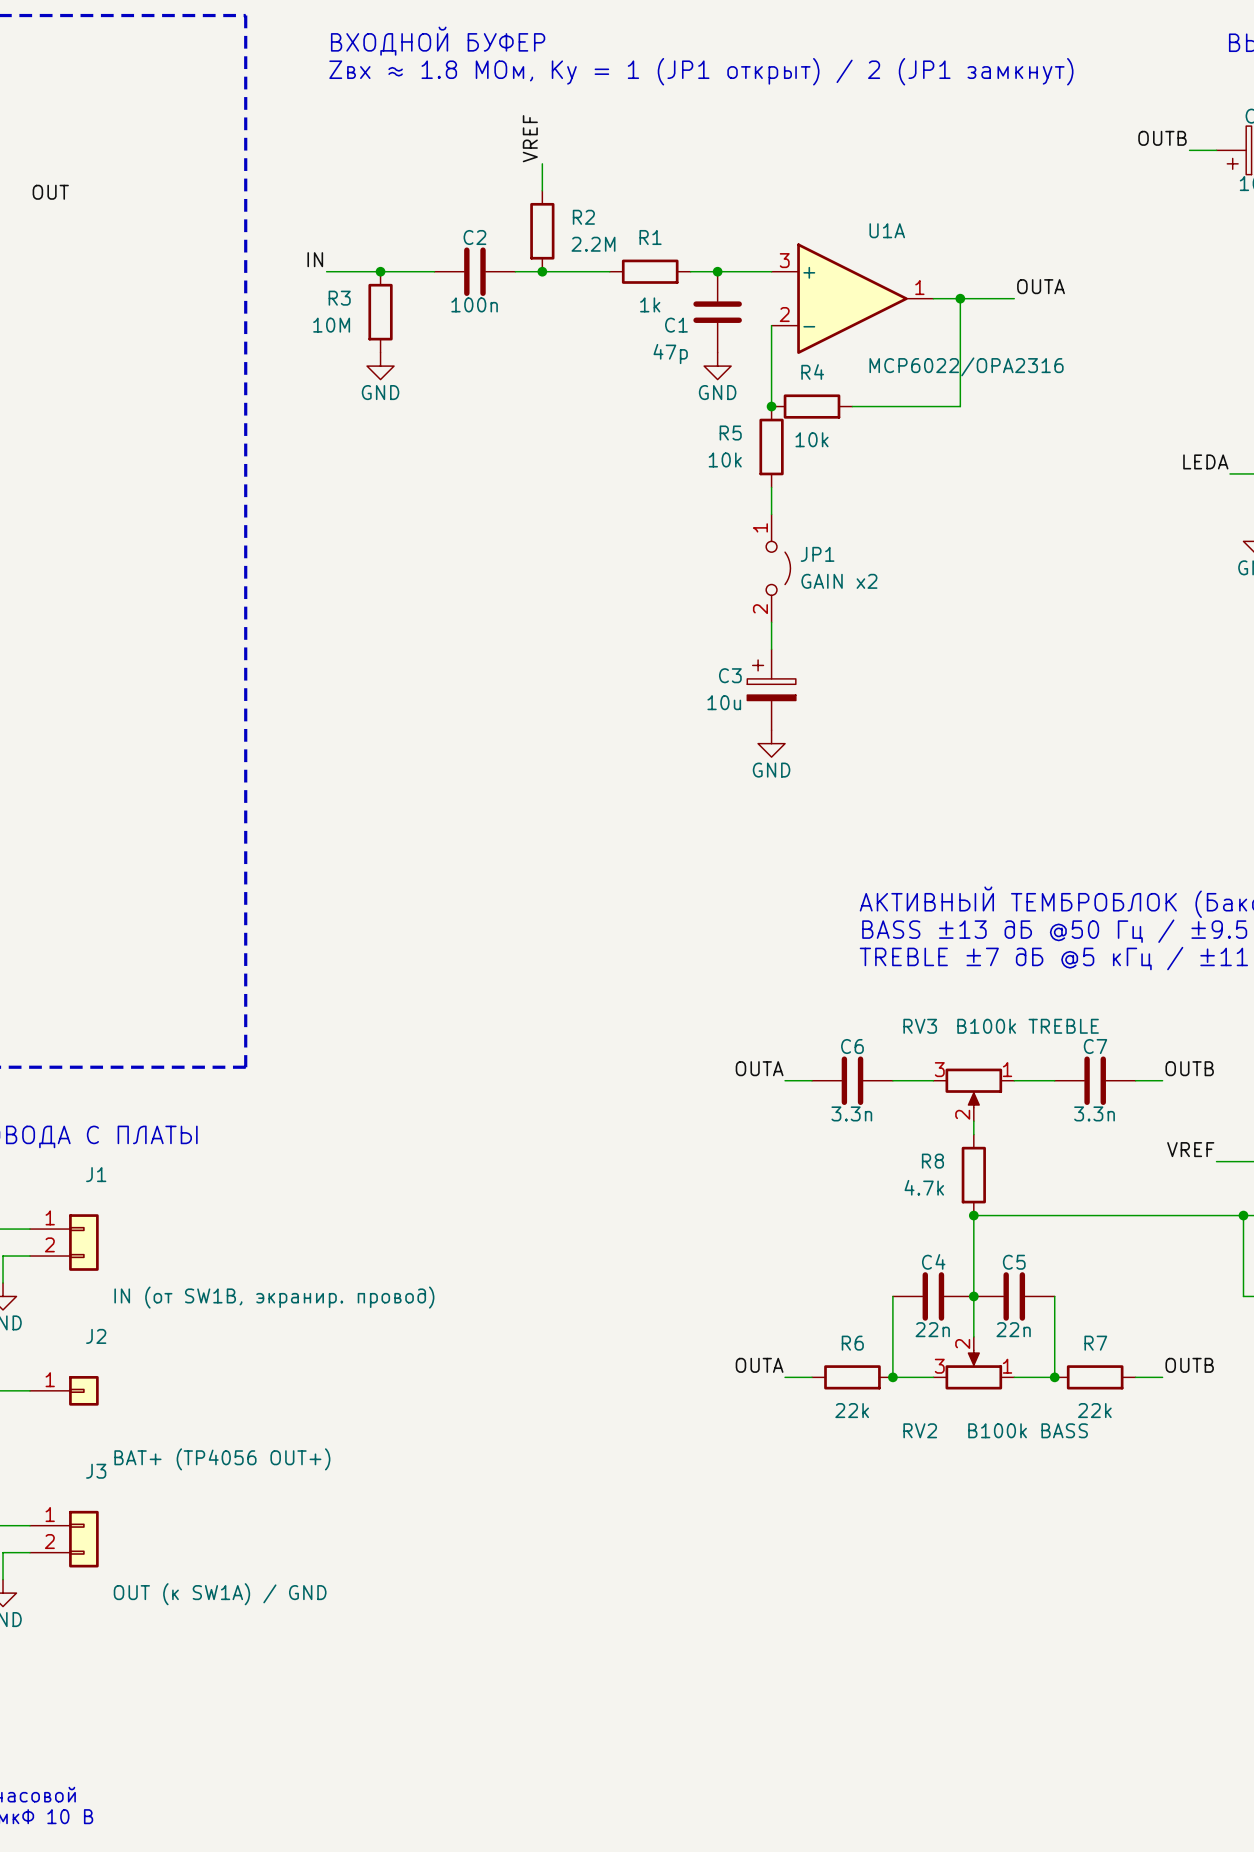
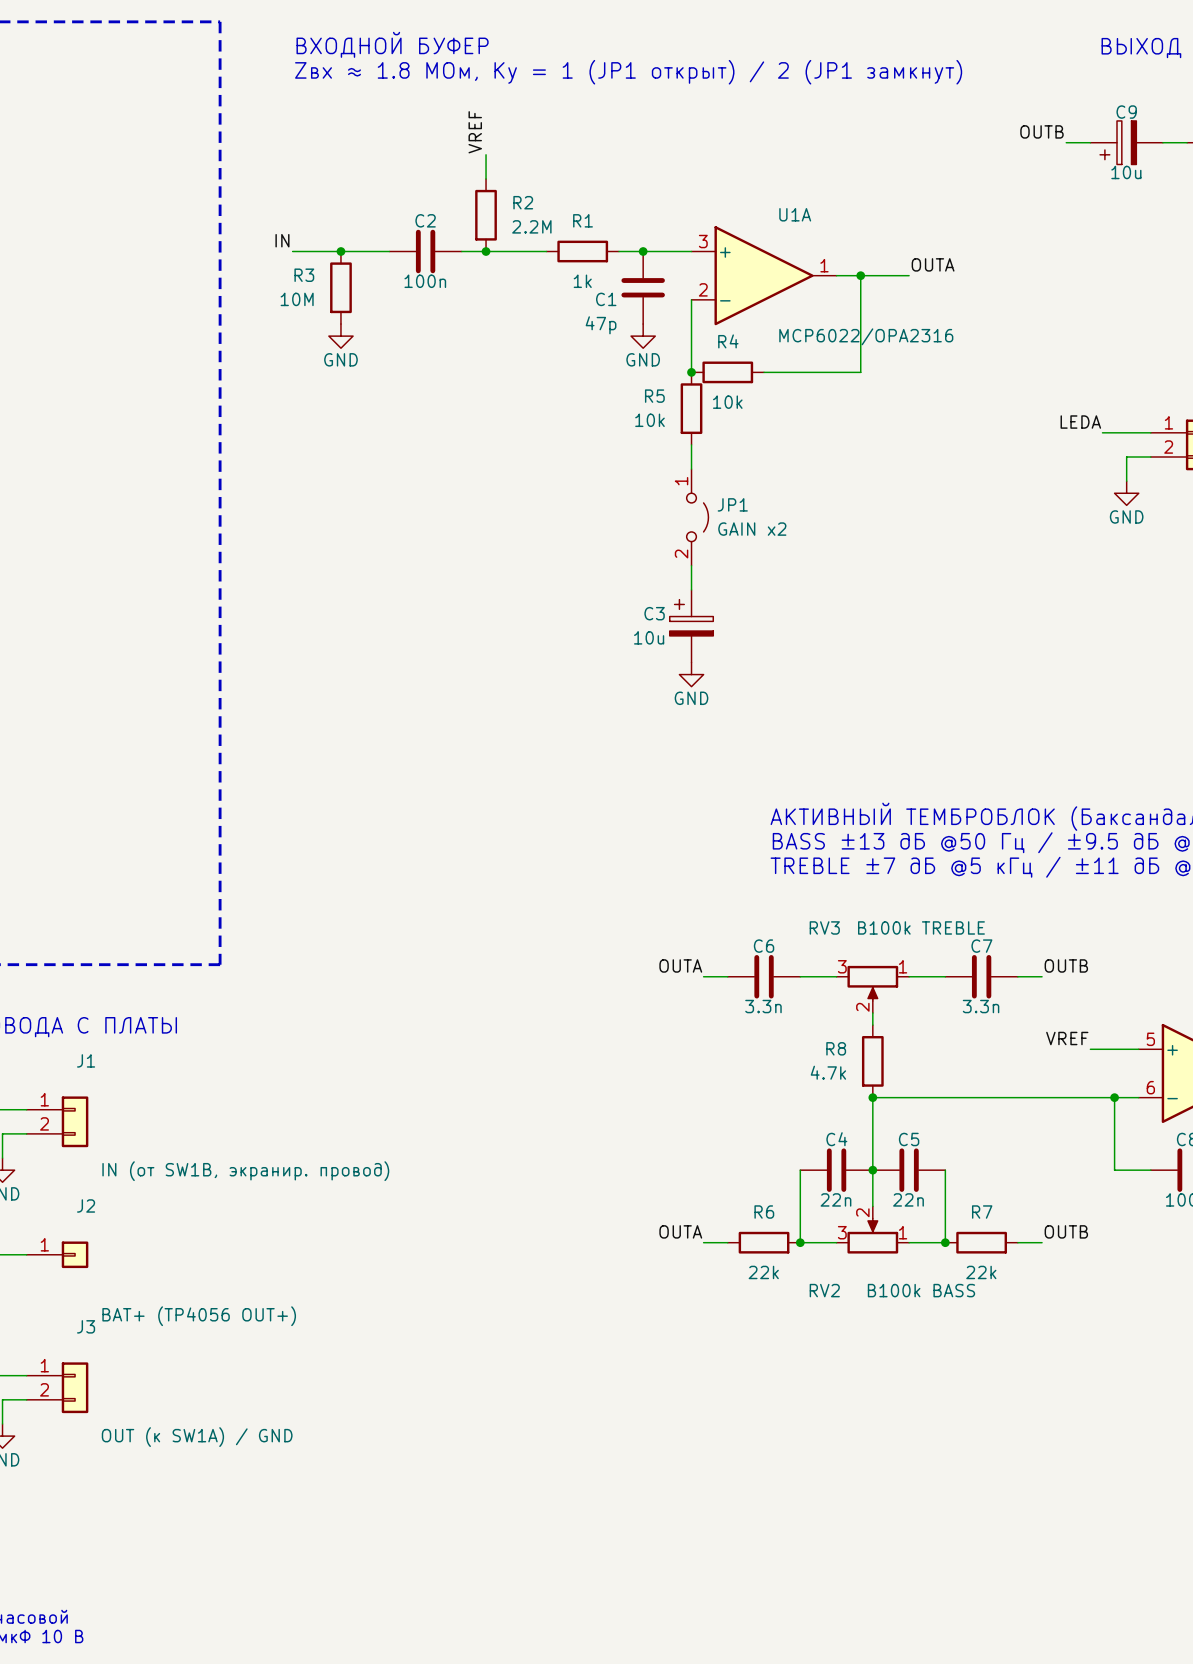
label: OUT (50, 192) -> none

